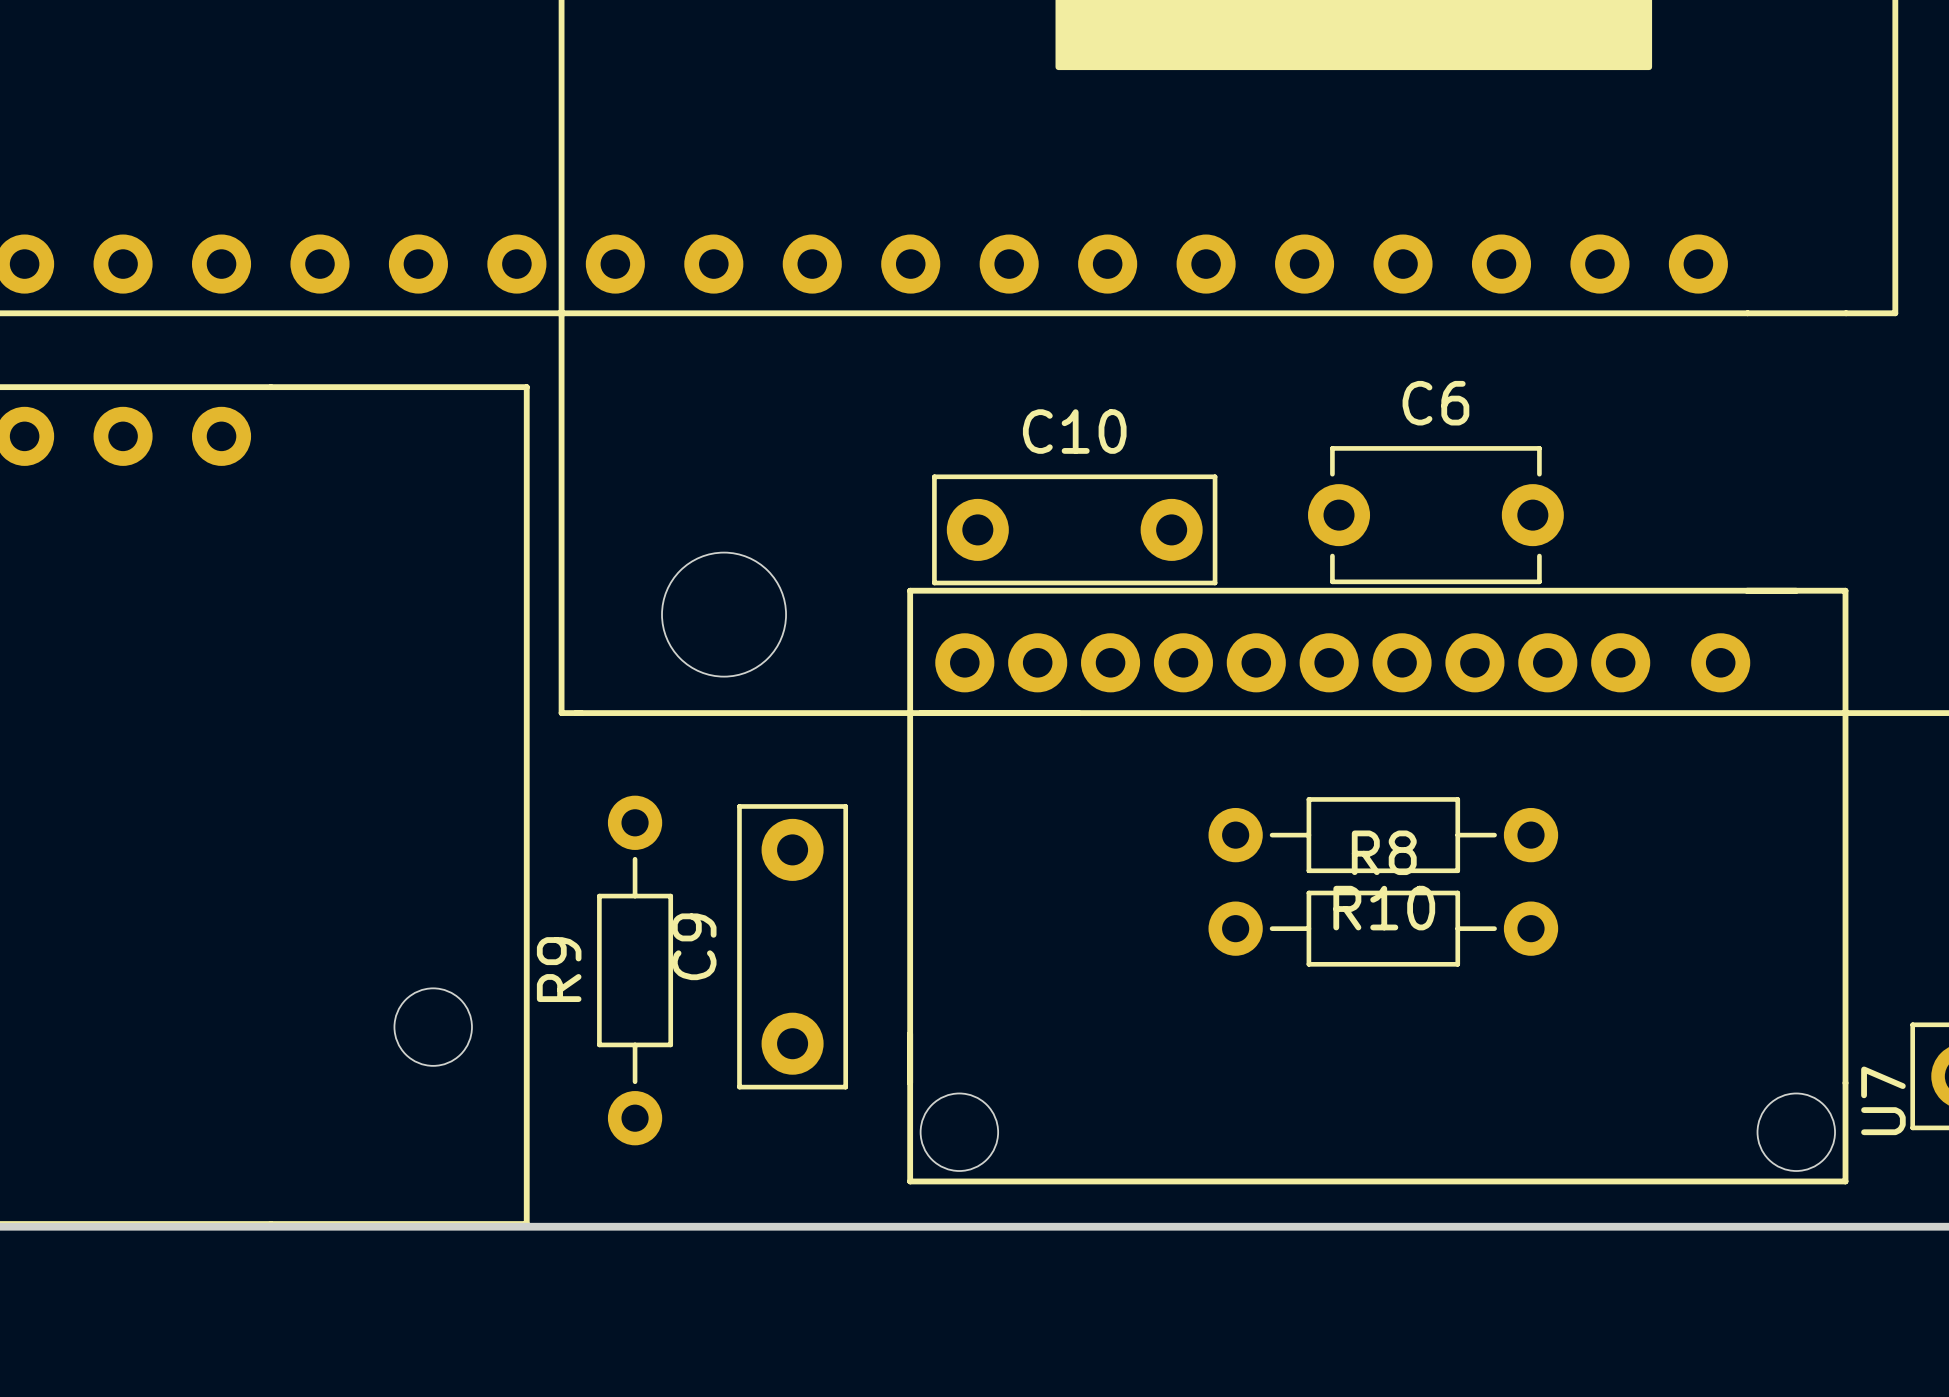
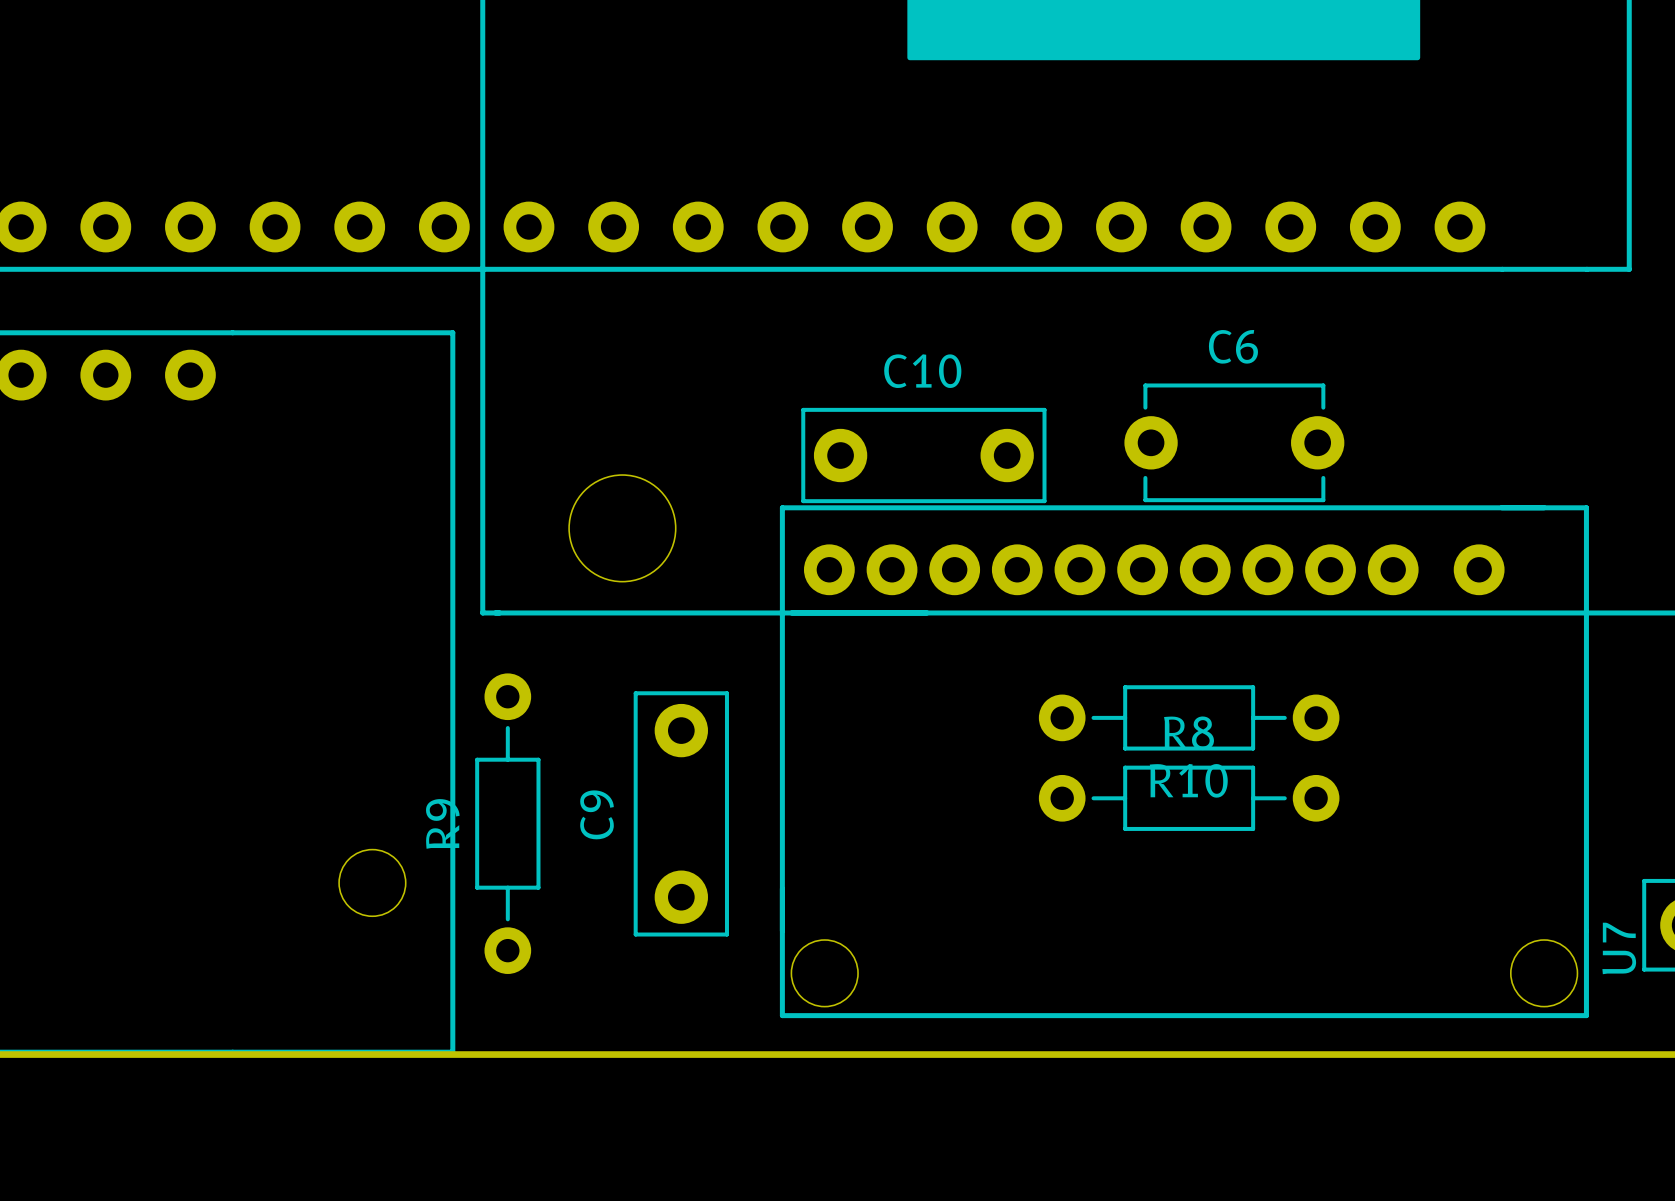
R9 position: (635, 970) -> (507, 823)

